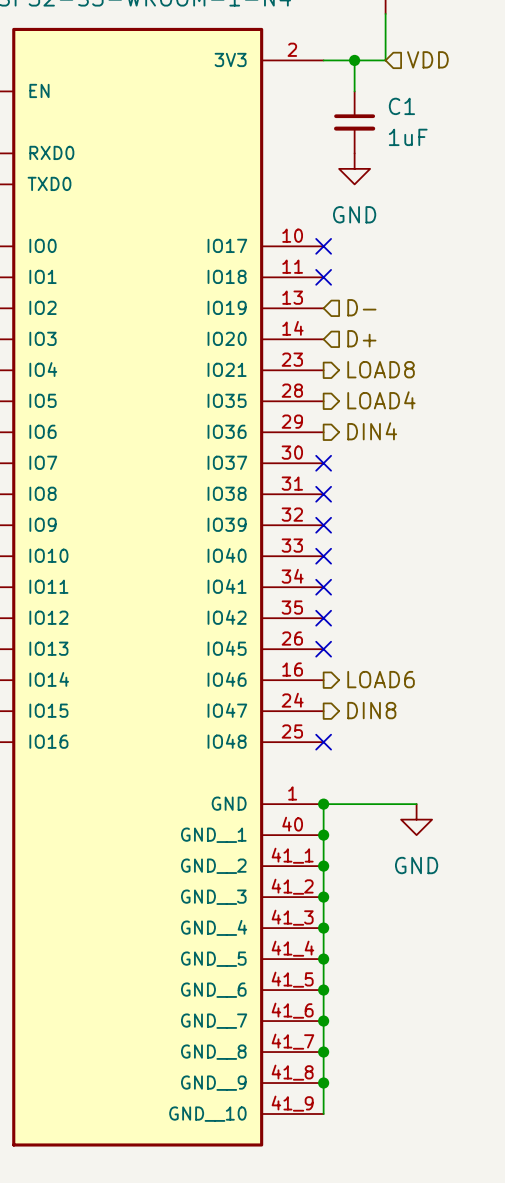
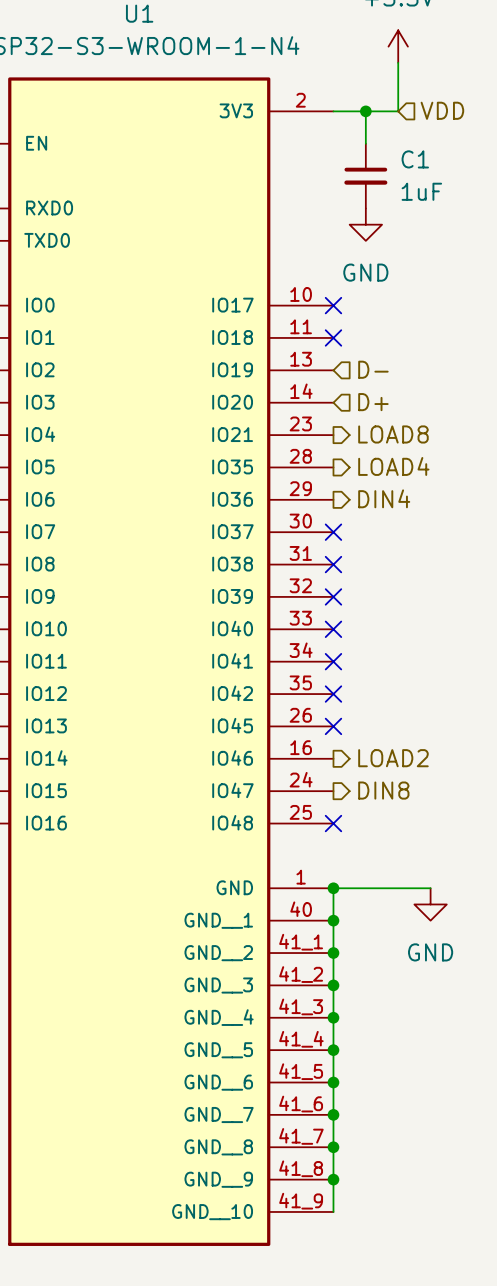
hierarchical label: LOAD6 (381, 679) -> LOAD2 (393, 758)

